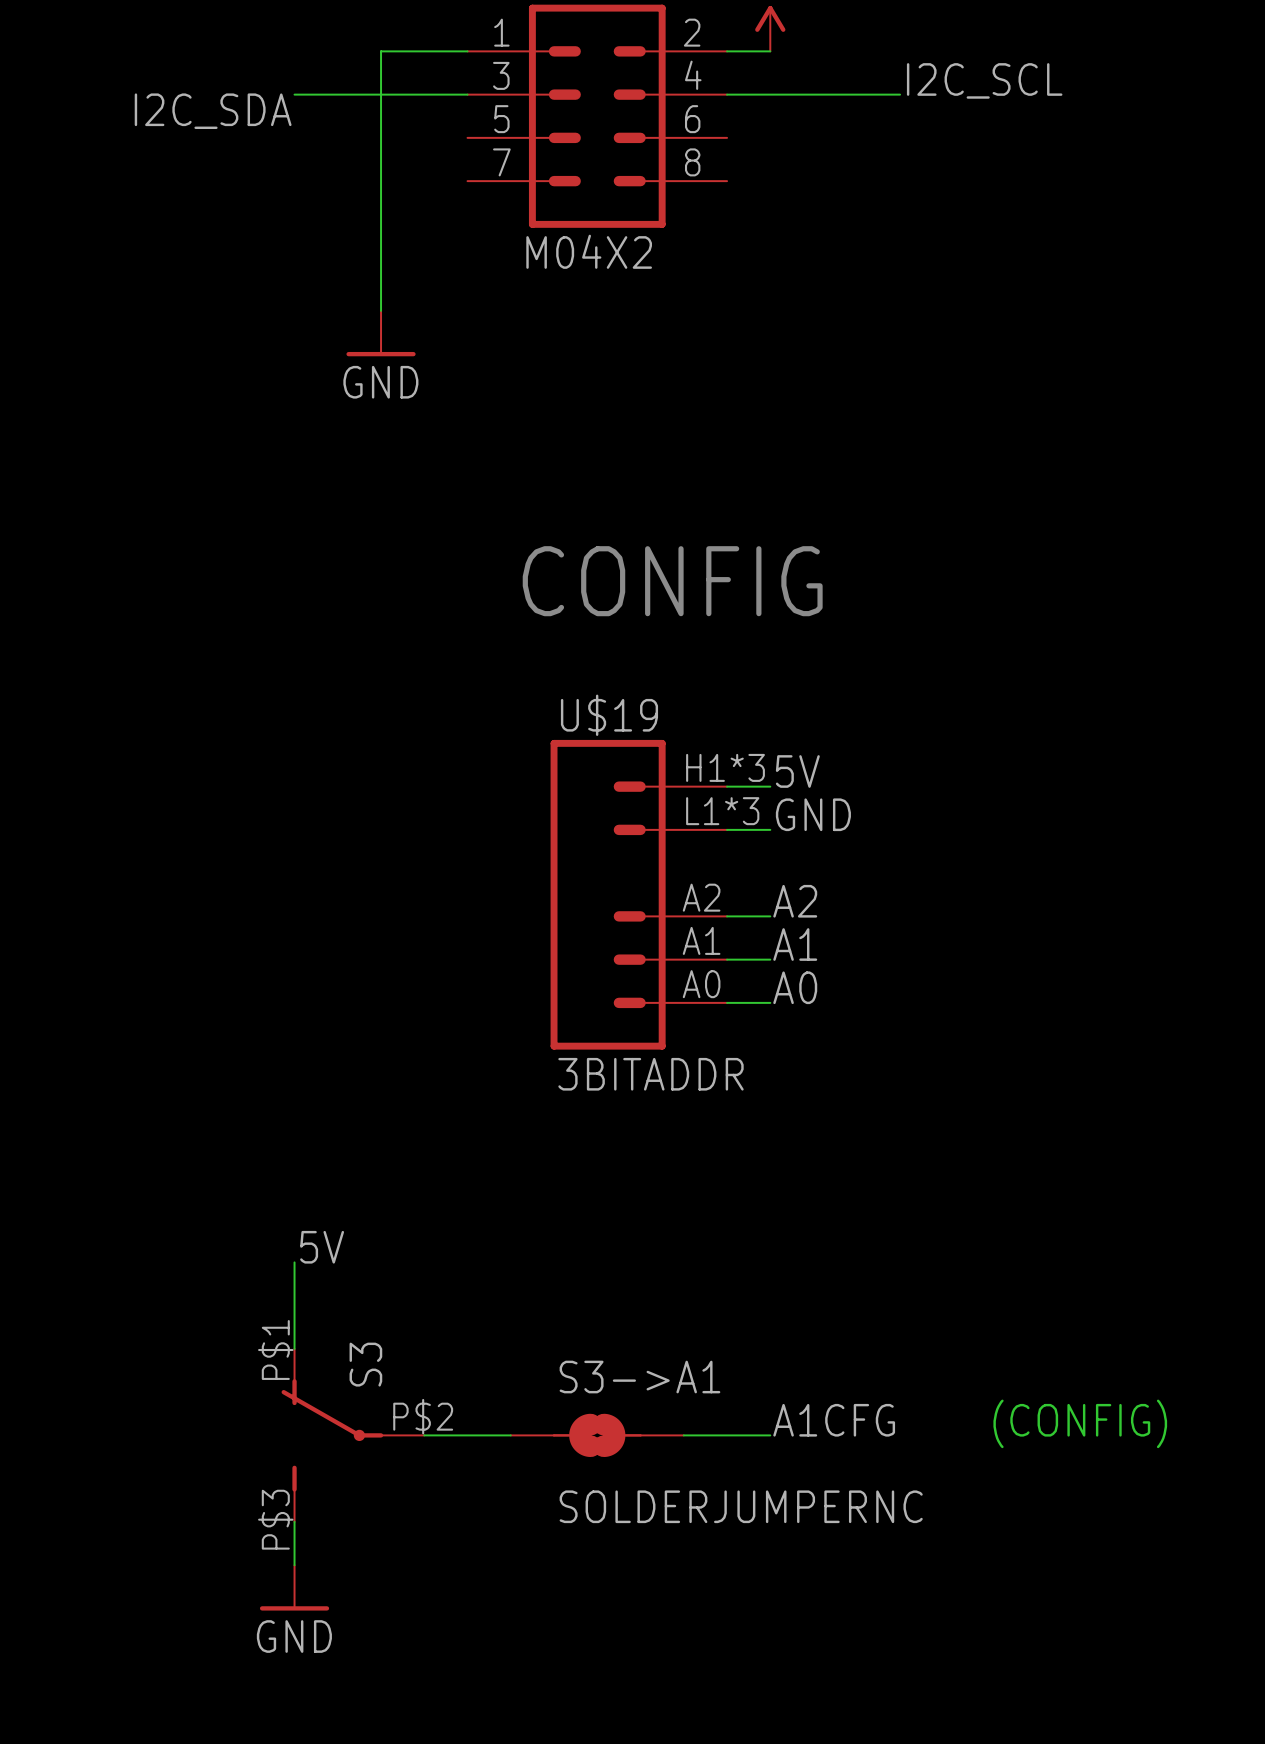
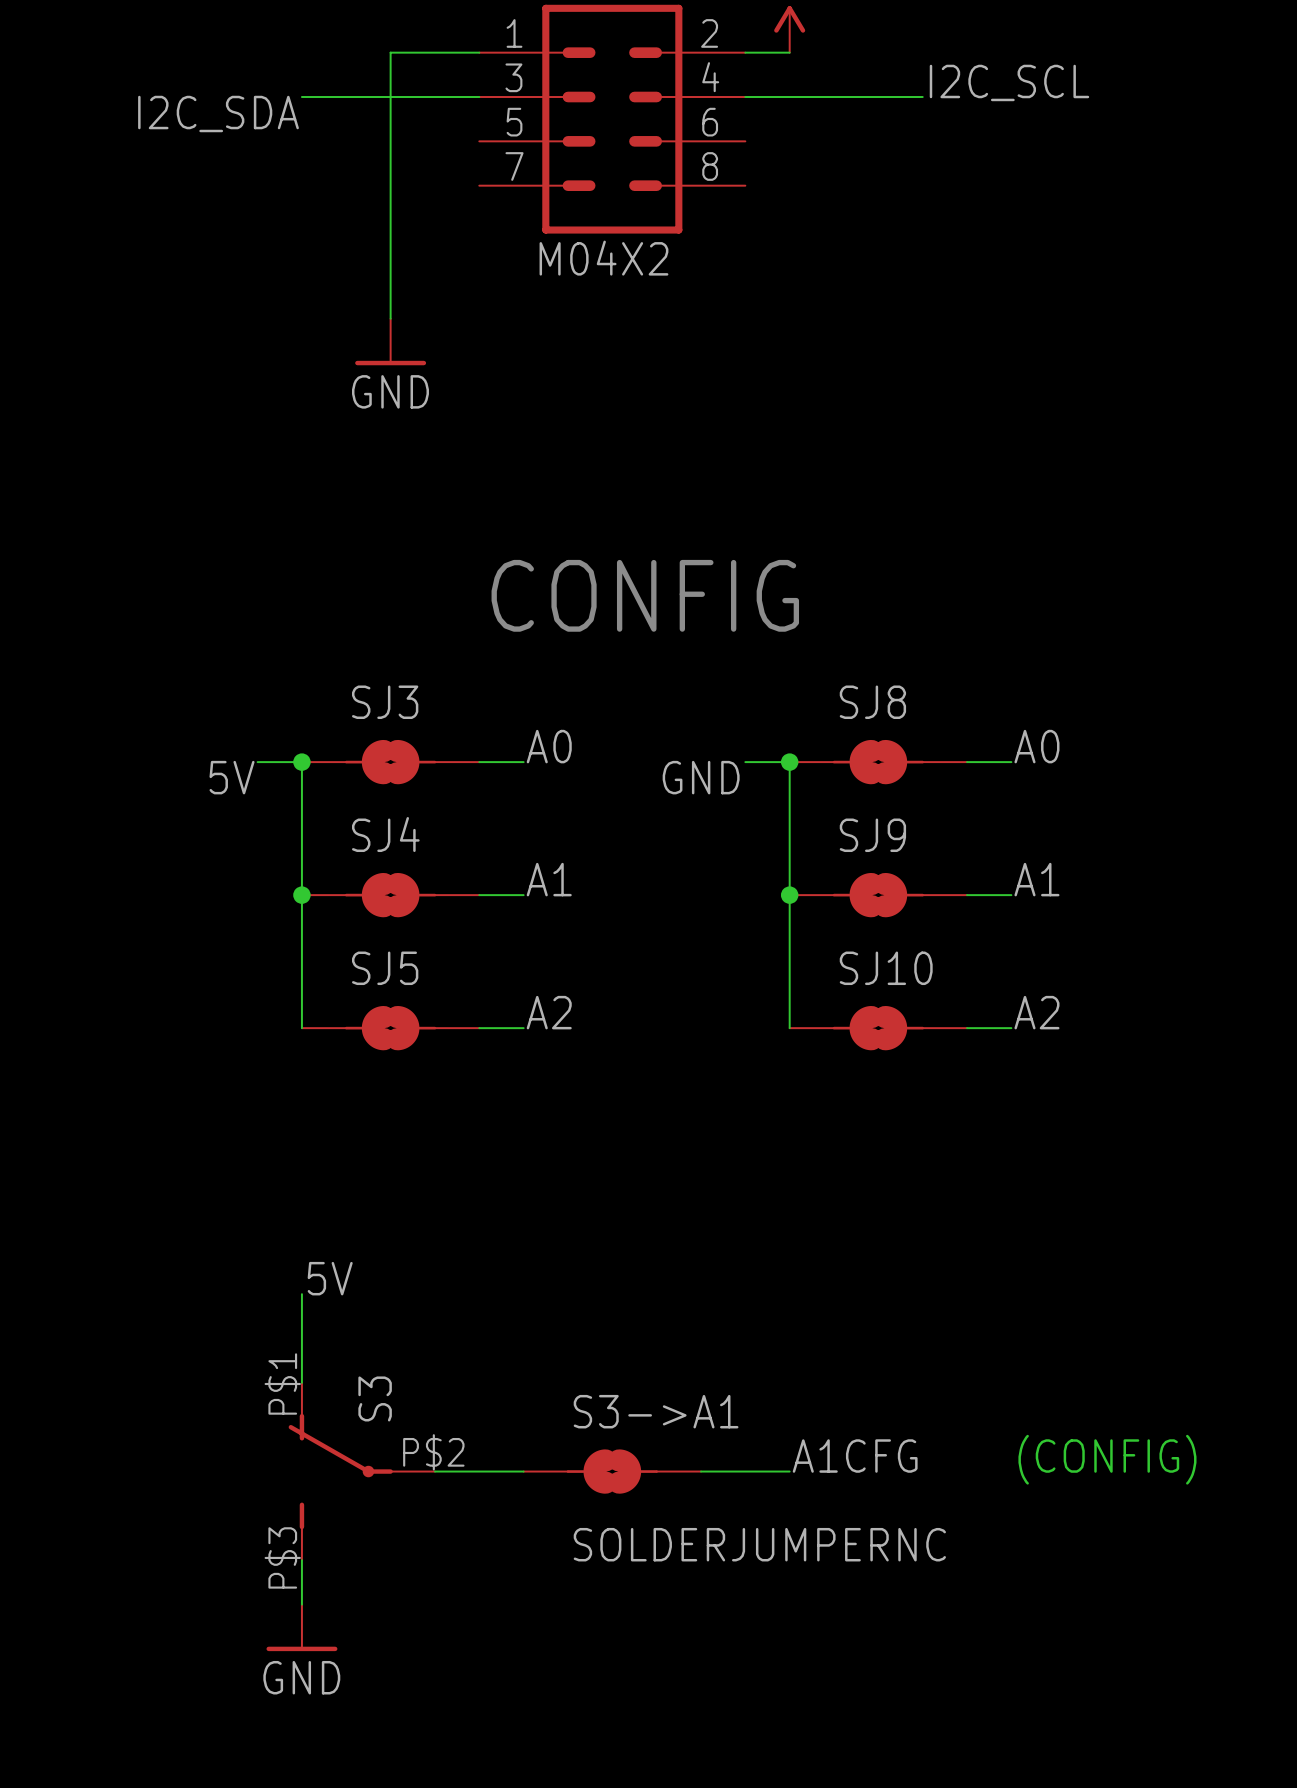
text position: CONFIG (672, 581) -> CONFIG (645, 595)
label: none -> A0 (549, 746)
label: none -> A0 (1036, 746)
wire: none -> (257, 762) (301, 762) (301, 1028)
junction: none -> (301, 762)
SJ3: none -> (390, 762)
wire: none -> (479, 762) (523, 762)
junction: none -> (789, 762)
SJ8: none -> (878, 762)
label: none -> 5V (232, 777)
label: 5V (797, 771) -> none
wire: (727, 786) (770, 786) -> (967, 762) (1011, 762)
label position: GND (813, 814) -> GND (701, 777)
wire: (727, 829) (770, 829) -> (967, 895) (1011, 895)
label: none -> A1 (549, 879)
label: none -> A1 (1036, 879)
junction: none -> (301, 895)
SJ4: none -> (390, 895)
junction: none -> (789, 895)
SJ9: none -> (878, 895)
U$19: 3BITADDR (638, 894) -> none
label: A2 (795, 901) -> none
wire: (727, 916) (770, 916) -> (479, 895) (523, 895)
label: A1 (795, 944) -> none
wire: (727, 959) (770, 959) -> (967, 1028) (1011, 1028)
label: none -> A2 (549, 1012)
label: A0 (795, 987) -> none
label: none -> A2 (1036, 1012)
SJ5: none -> (390, 1028)
wire: none -> (479, 1028) (523, 1028)
wire: (727, 1002) (770, 1002) -> (745, 762) (789, 762) (789, 1028)
SJ10: none -> (878, 1028)

